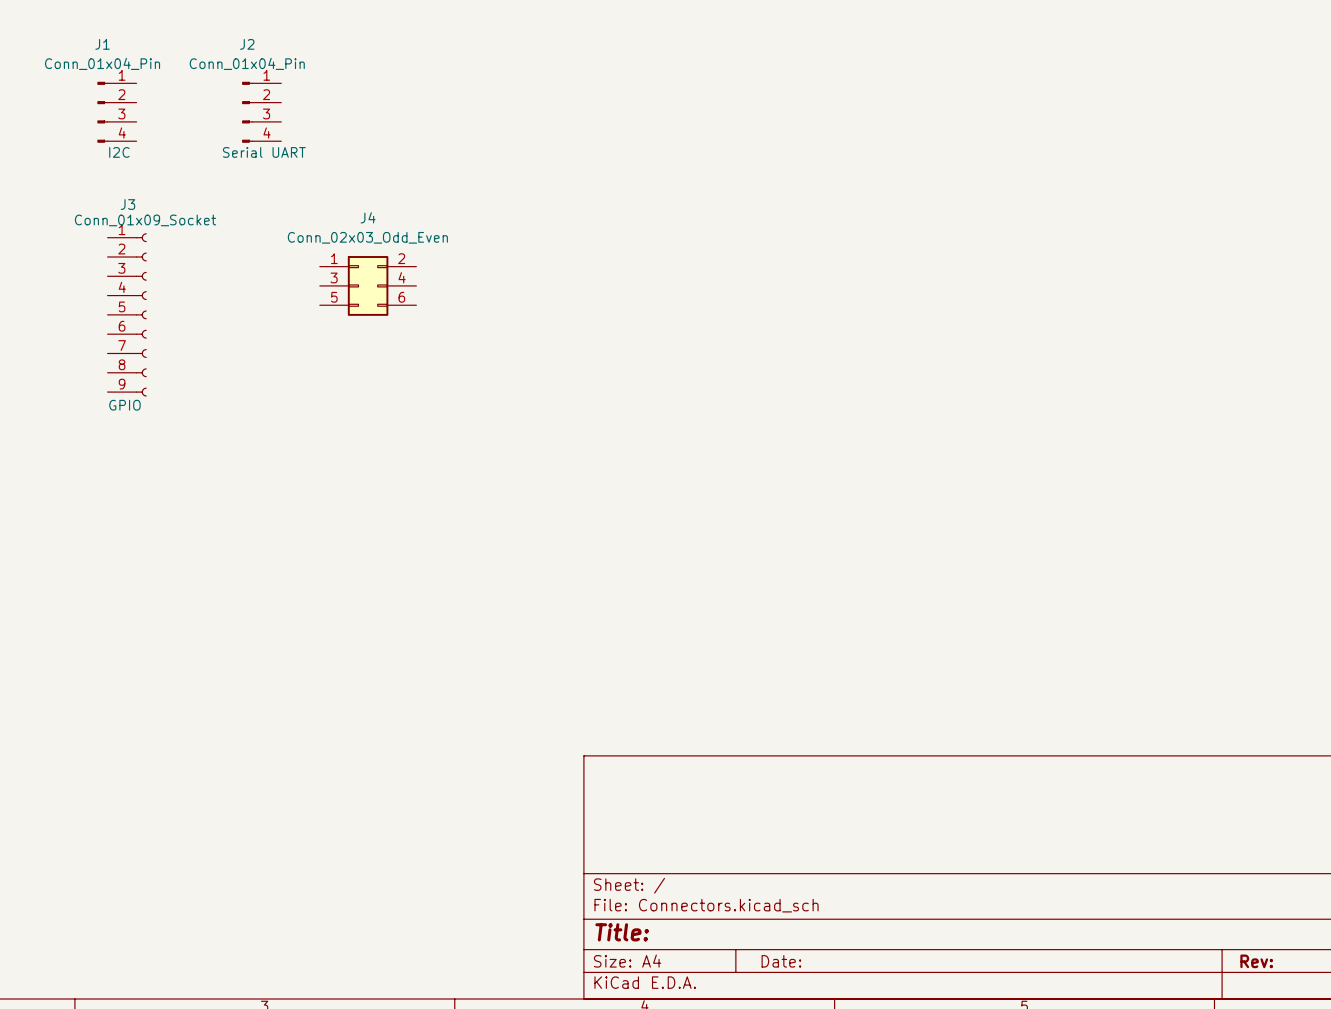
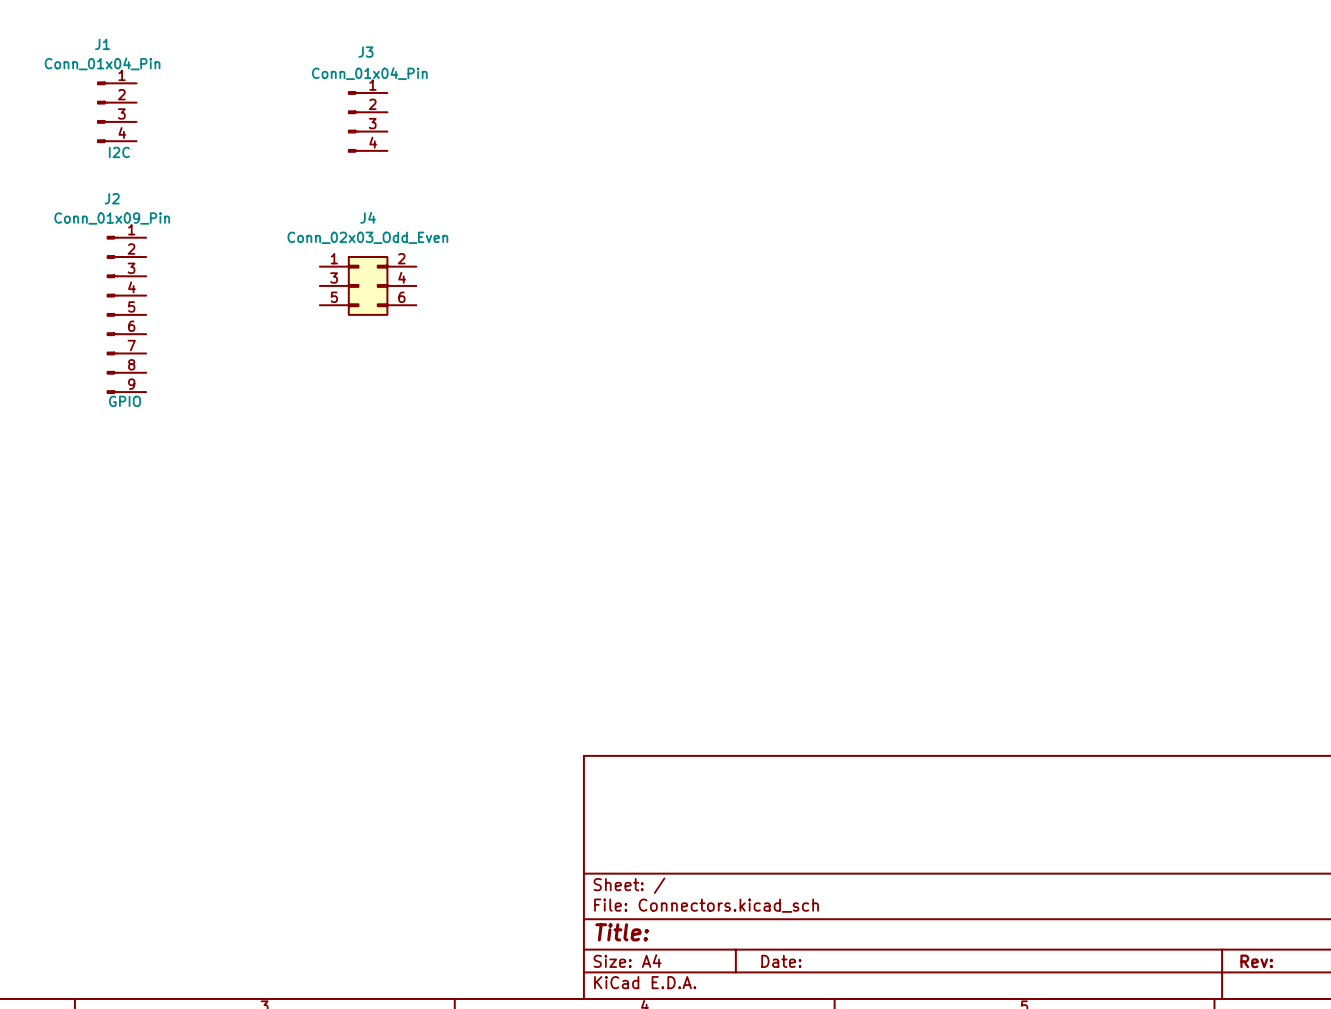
J2 name position: J2 (247, 44) -> J2 (112, 198)
J2 value: Conn_01x04_Pin (247, 63) -> Conn_01x09_Pin (112, 218)
J2 symbol: [242, 81, 282, 143] -> [107, 236, 147, 394]
J2 text: Serial UART (264, 152) -> GPIO (124, 401)
J3 name position: J3 (127, 204) -> J3 (365, 52)
J3 value: Conn_01x09_Socket (145, 220) -> Conn_01x04_Pin (369, 73)
J3 symbol: [107, 233, 147, 397] -> [348, 91, 388, 153]
J3 text: GPIO (124, 405) -> none

